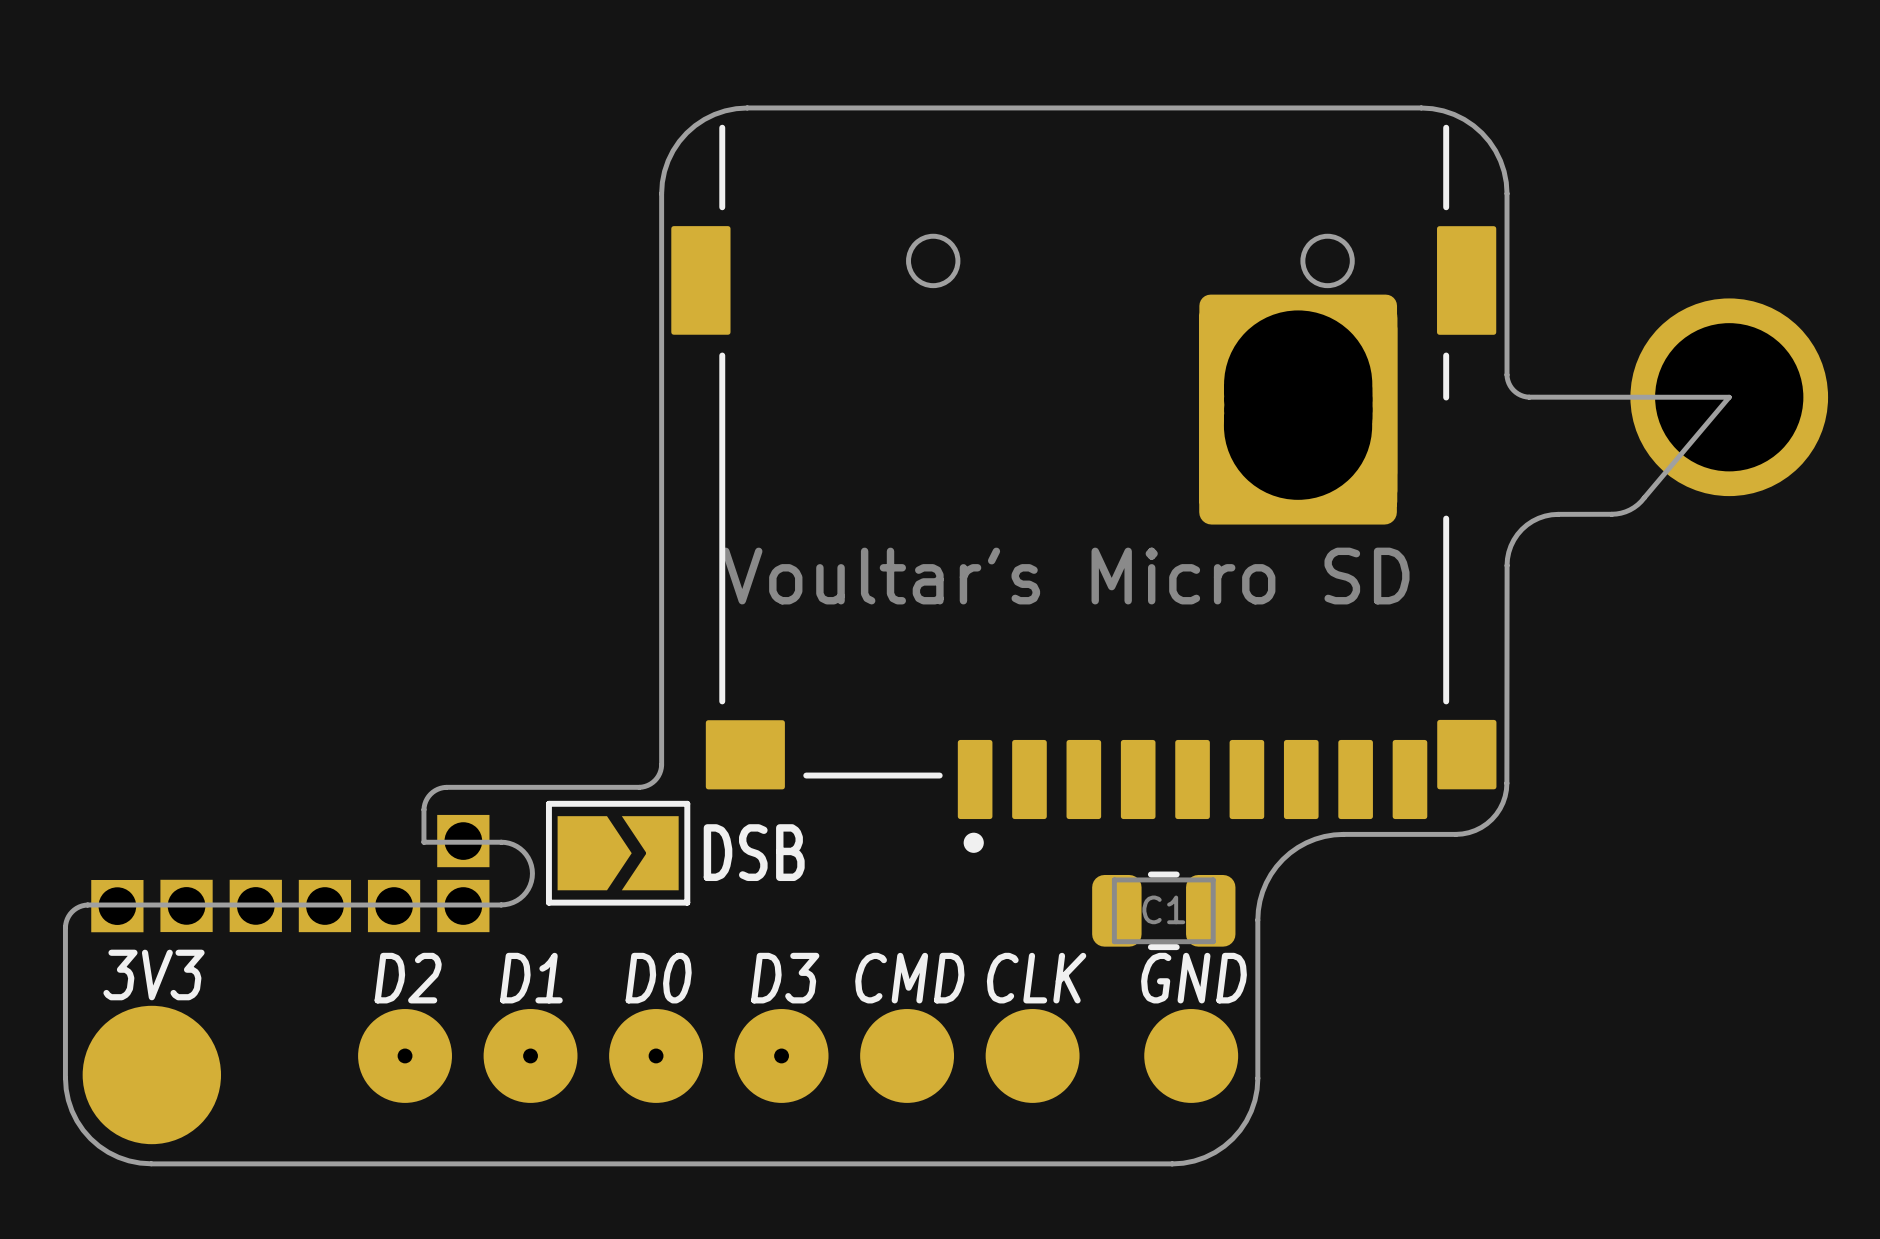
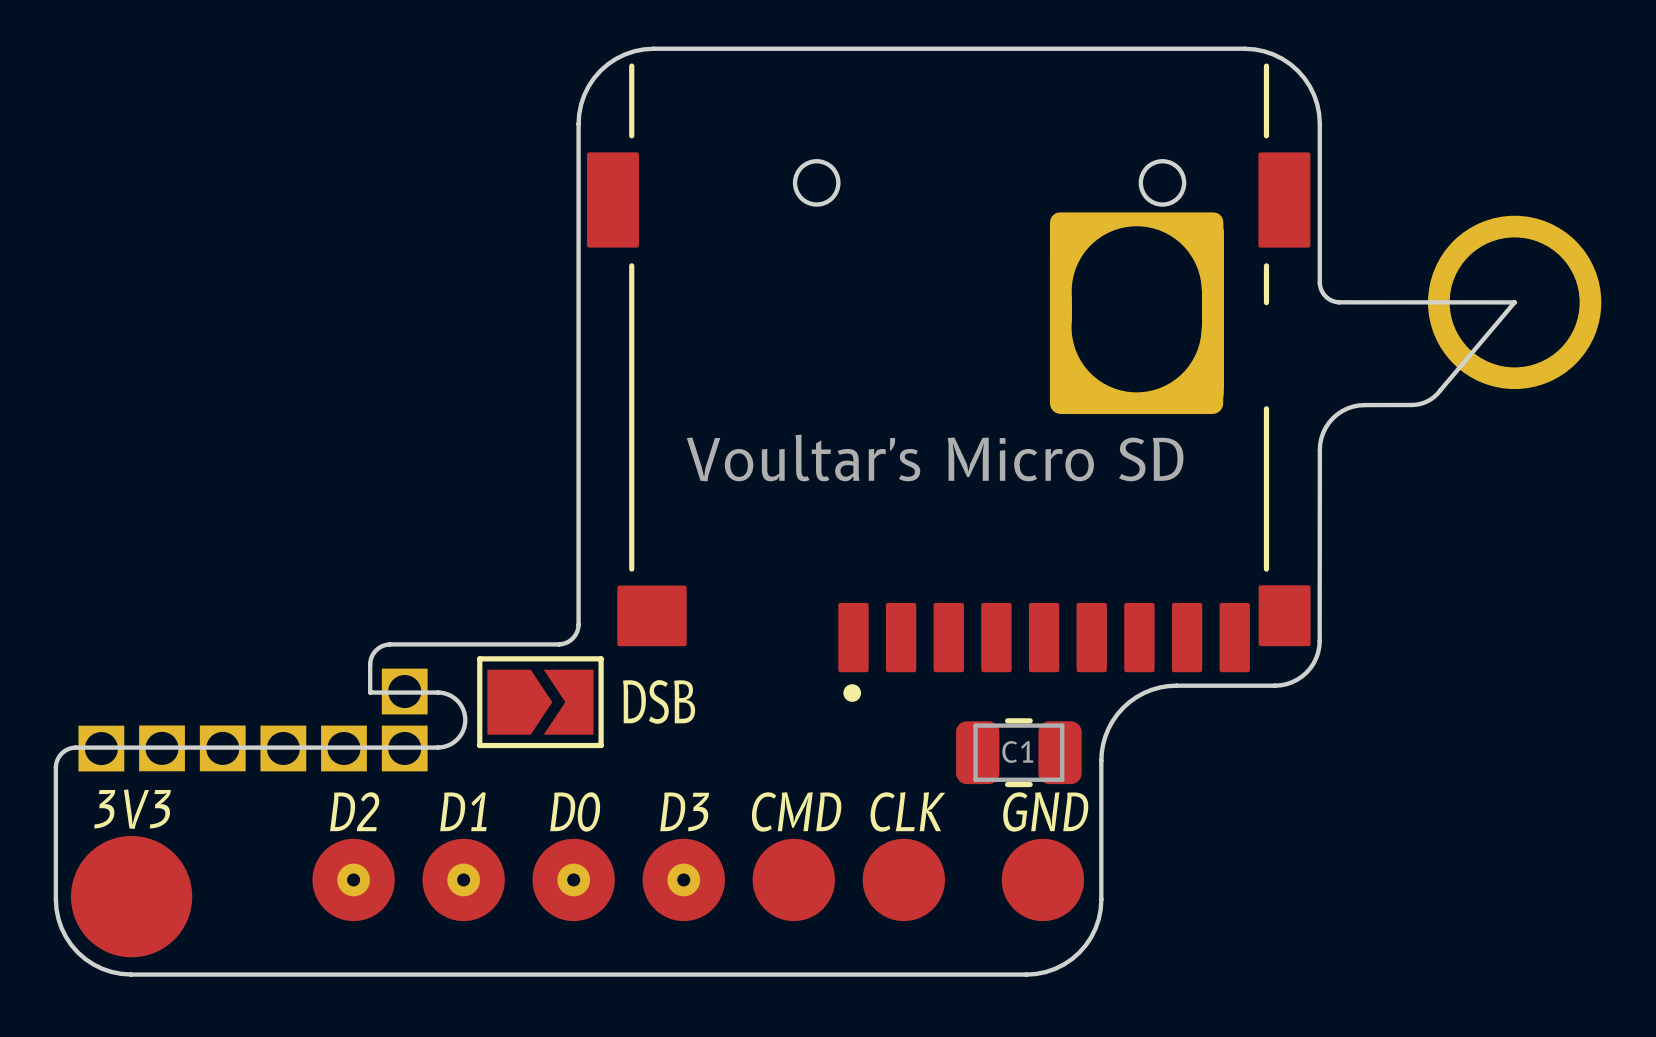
part footprint: [671, 124, 1497, 853] -> [587, 63, 1311, 702]

